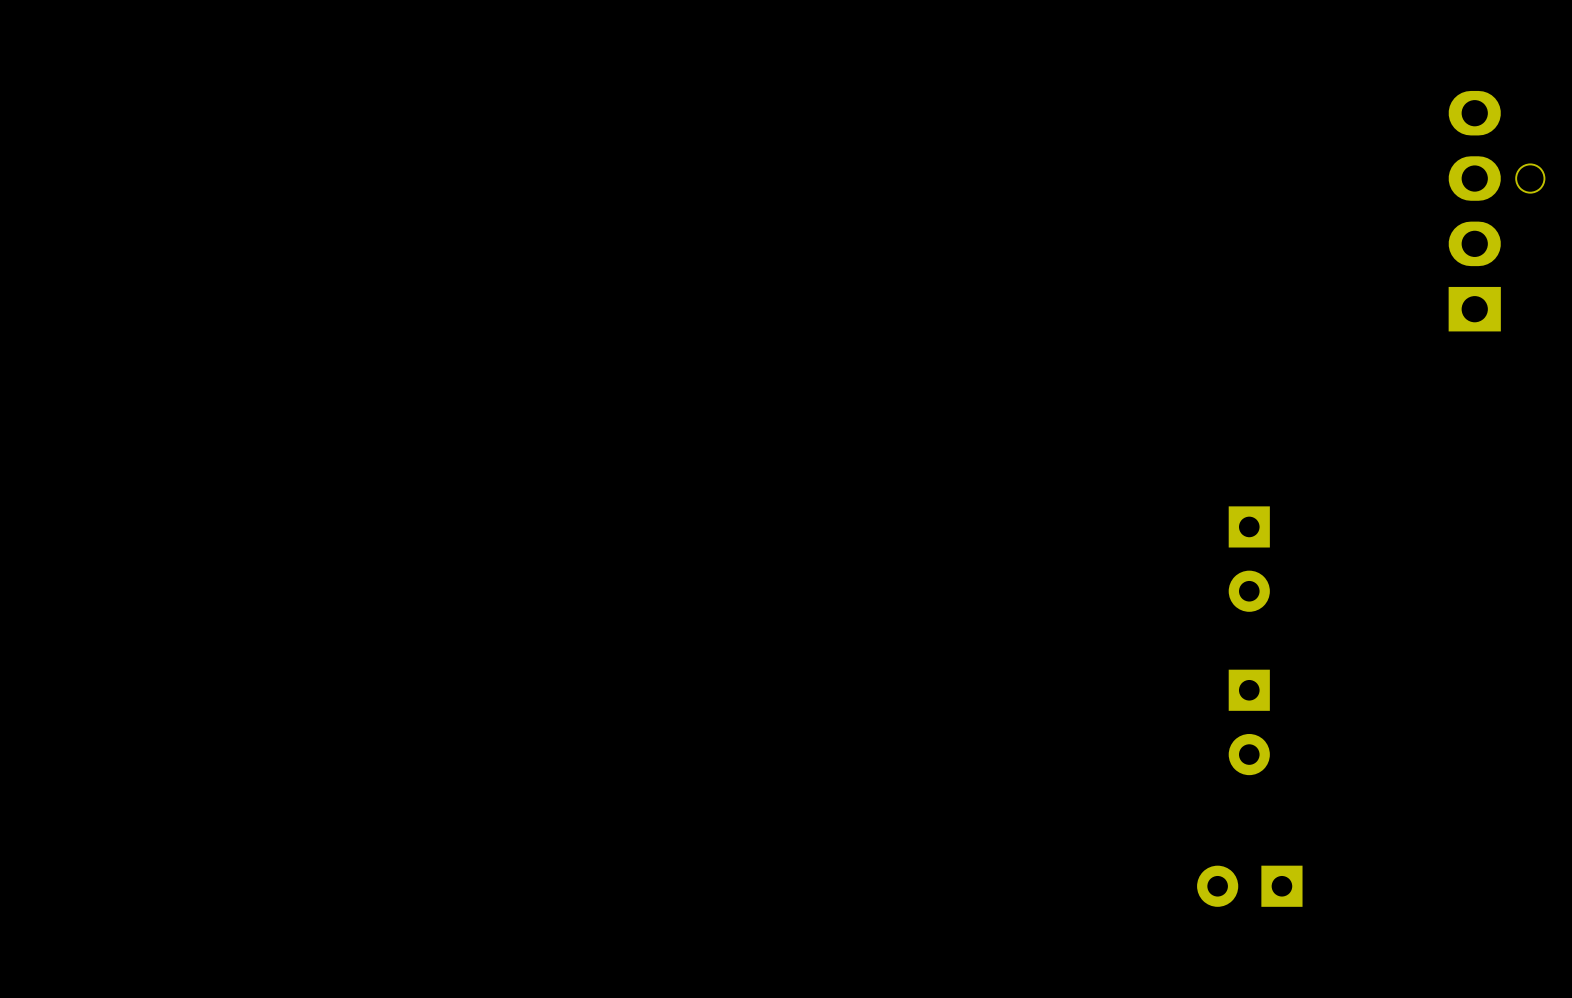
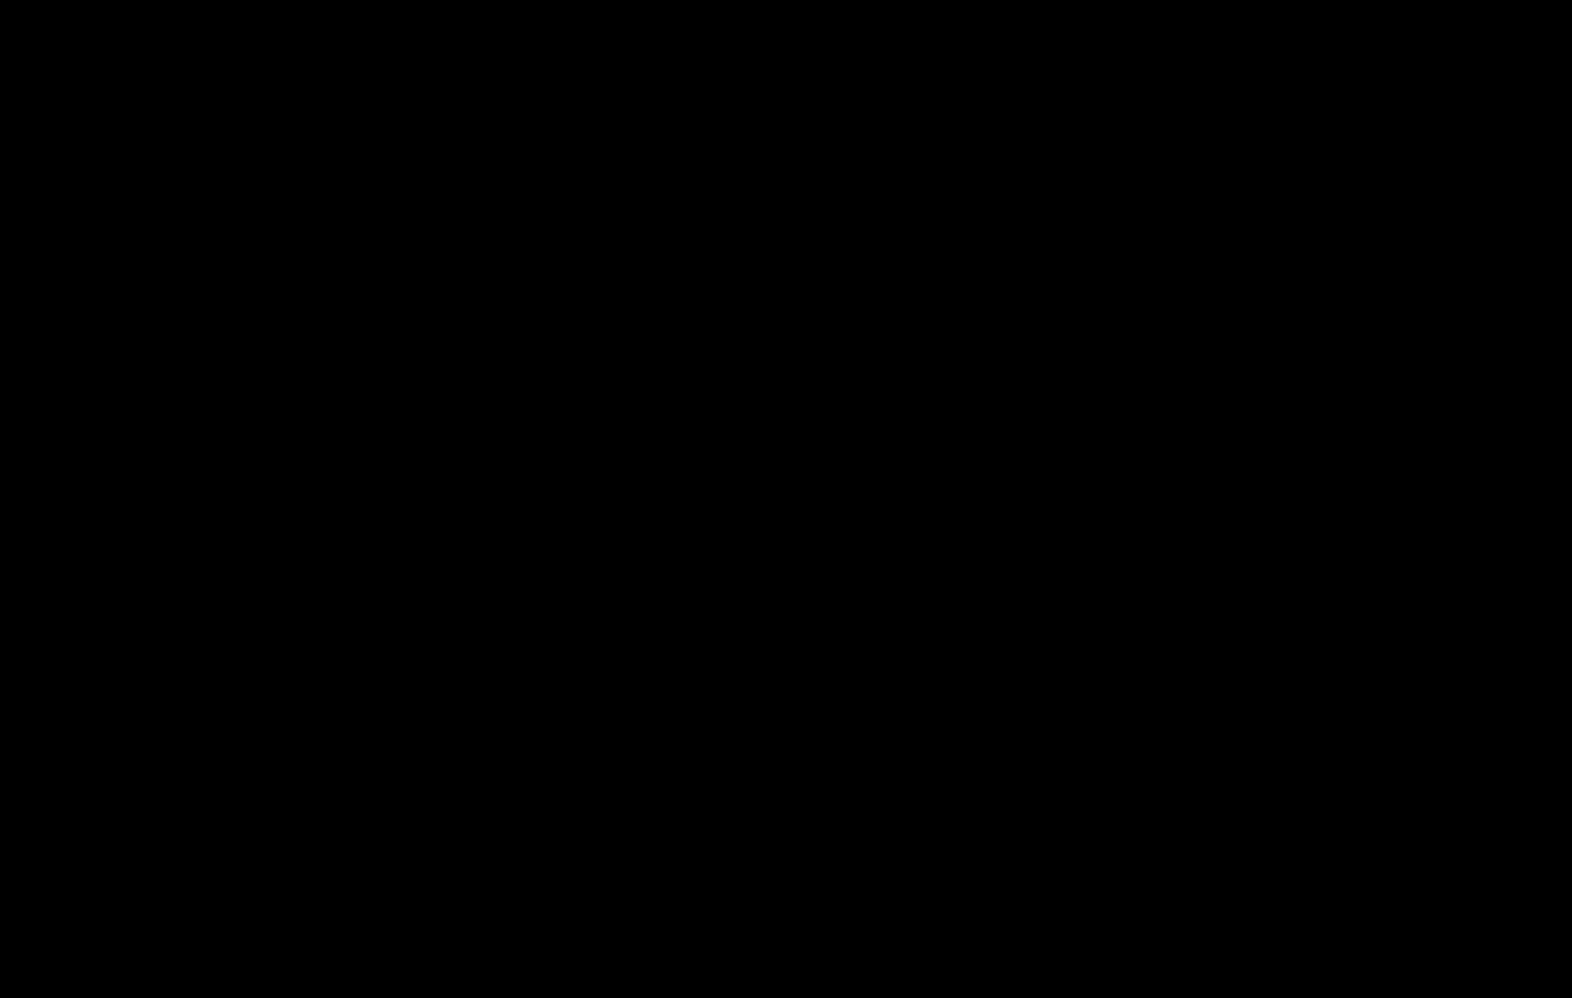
part: (1496, 211) -> none
part: (1249, 559) -> none
part: (1249, 722) -> none
part: (1249, 886) -> none

